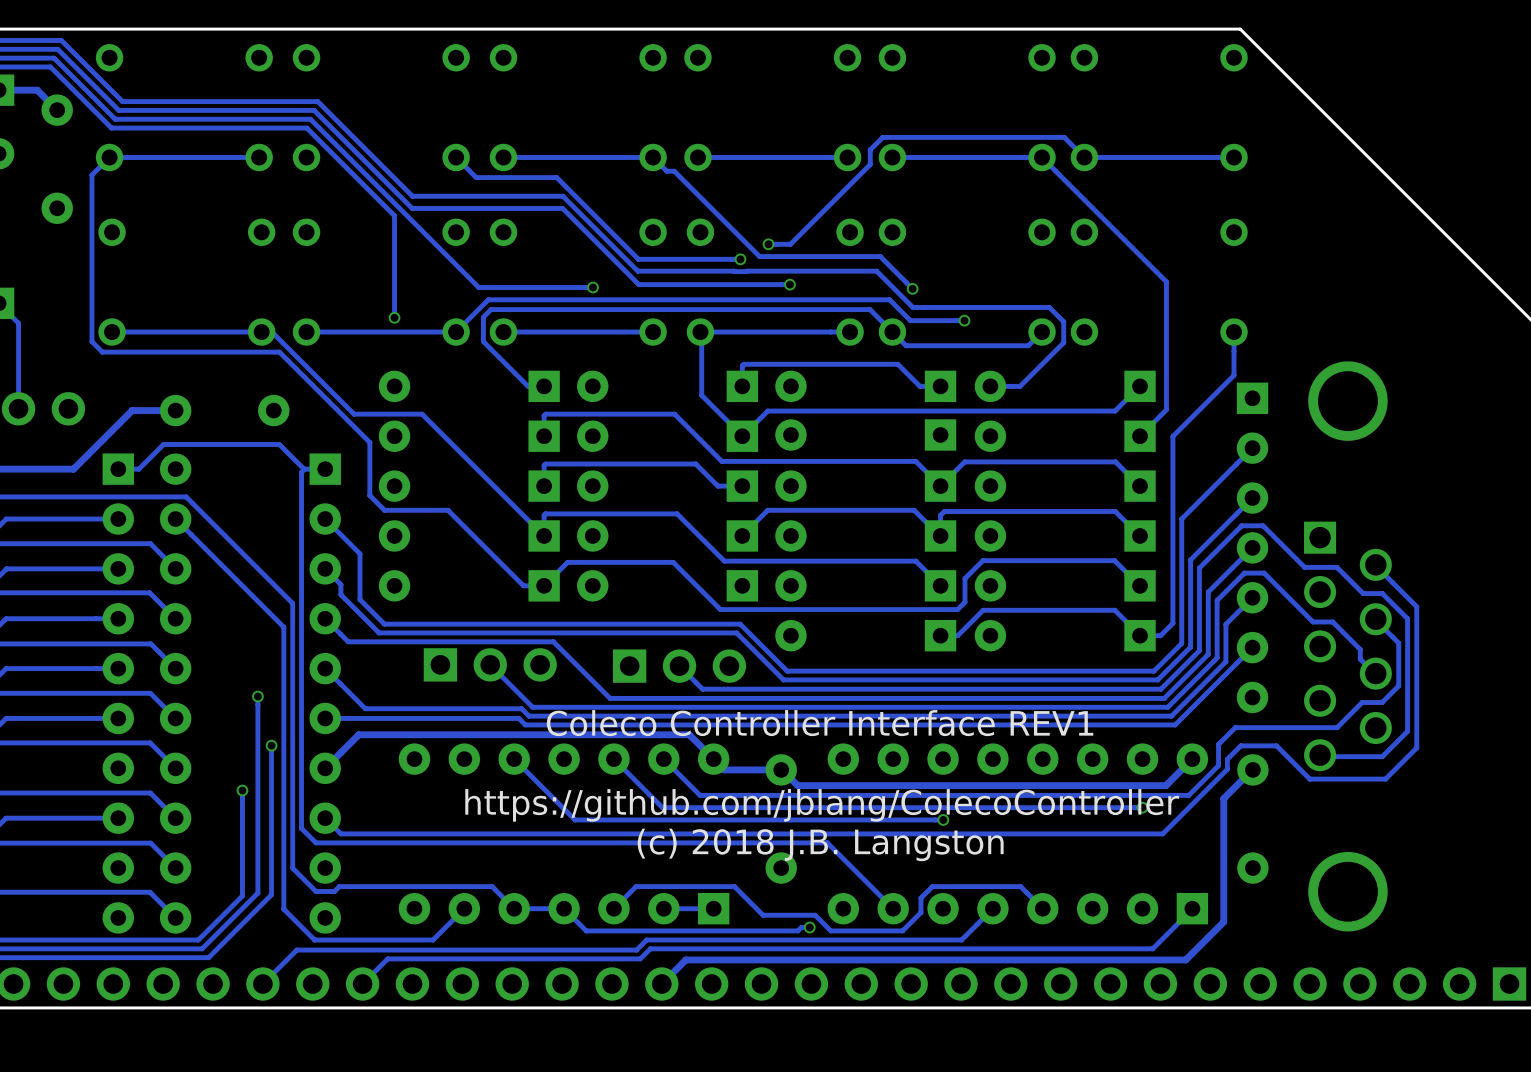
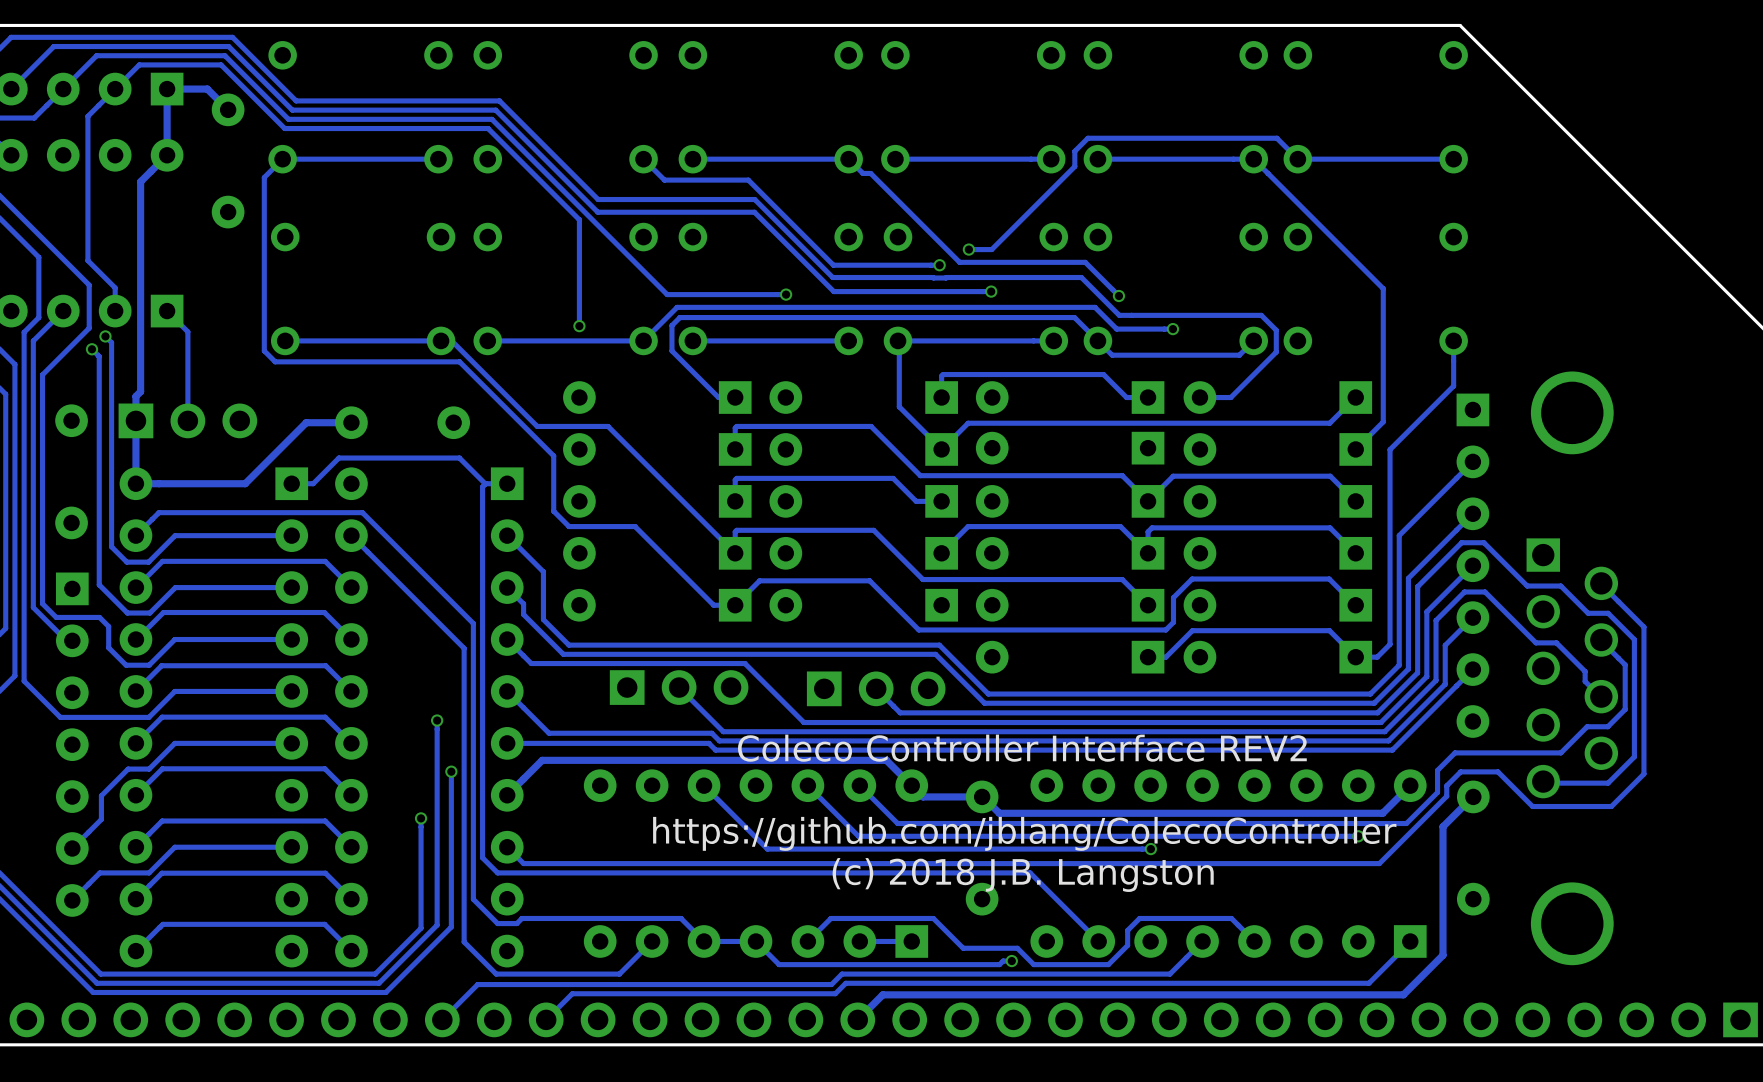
text: Coleco Controller Interface REV1 (820, 723) -> Coleco Controller Interface REV2 (1022, 748)

